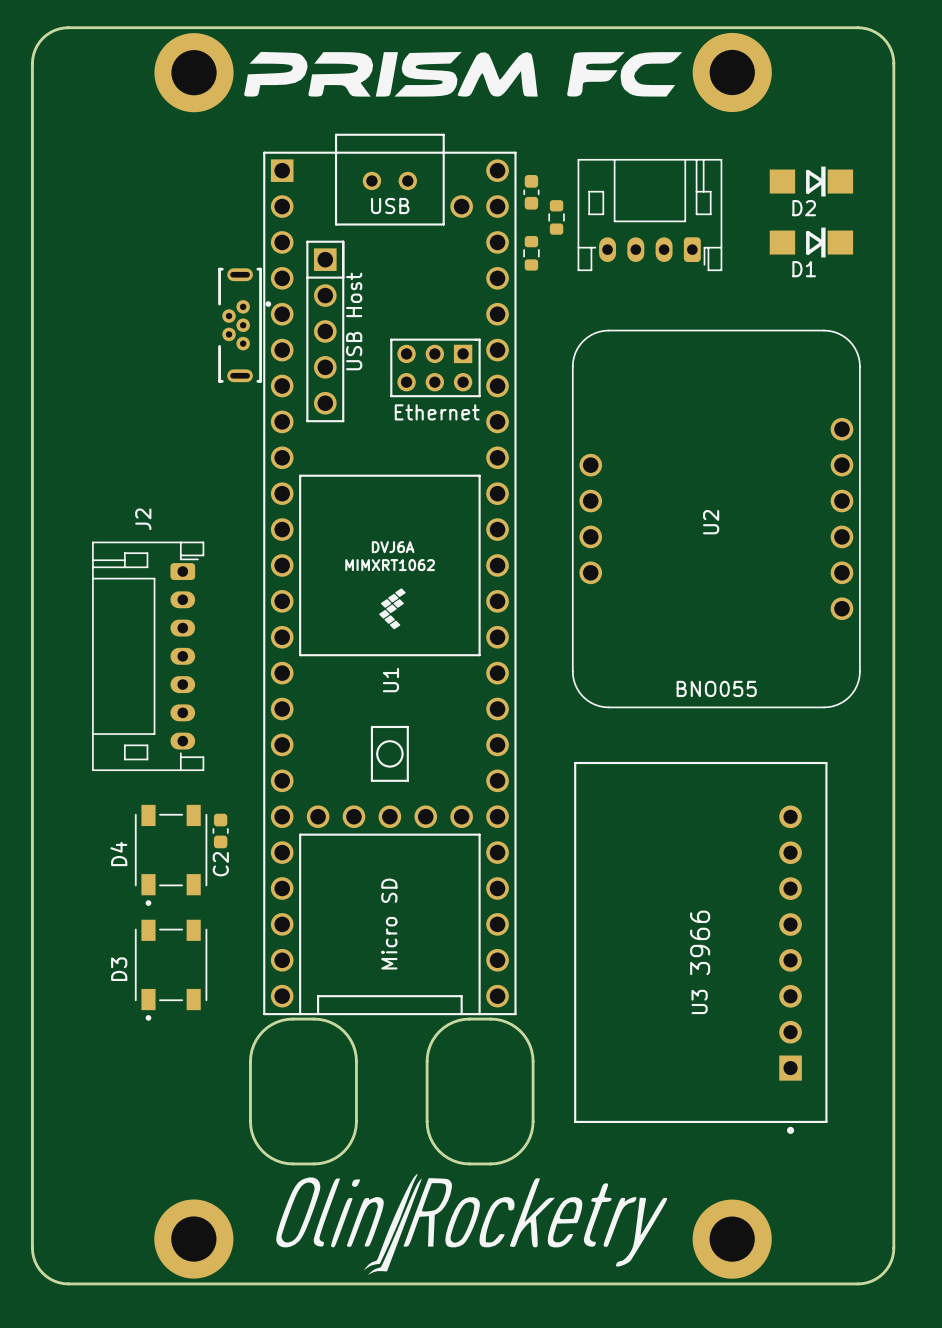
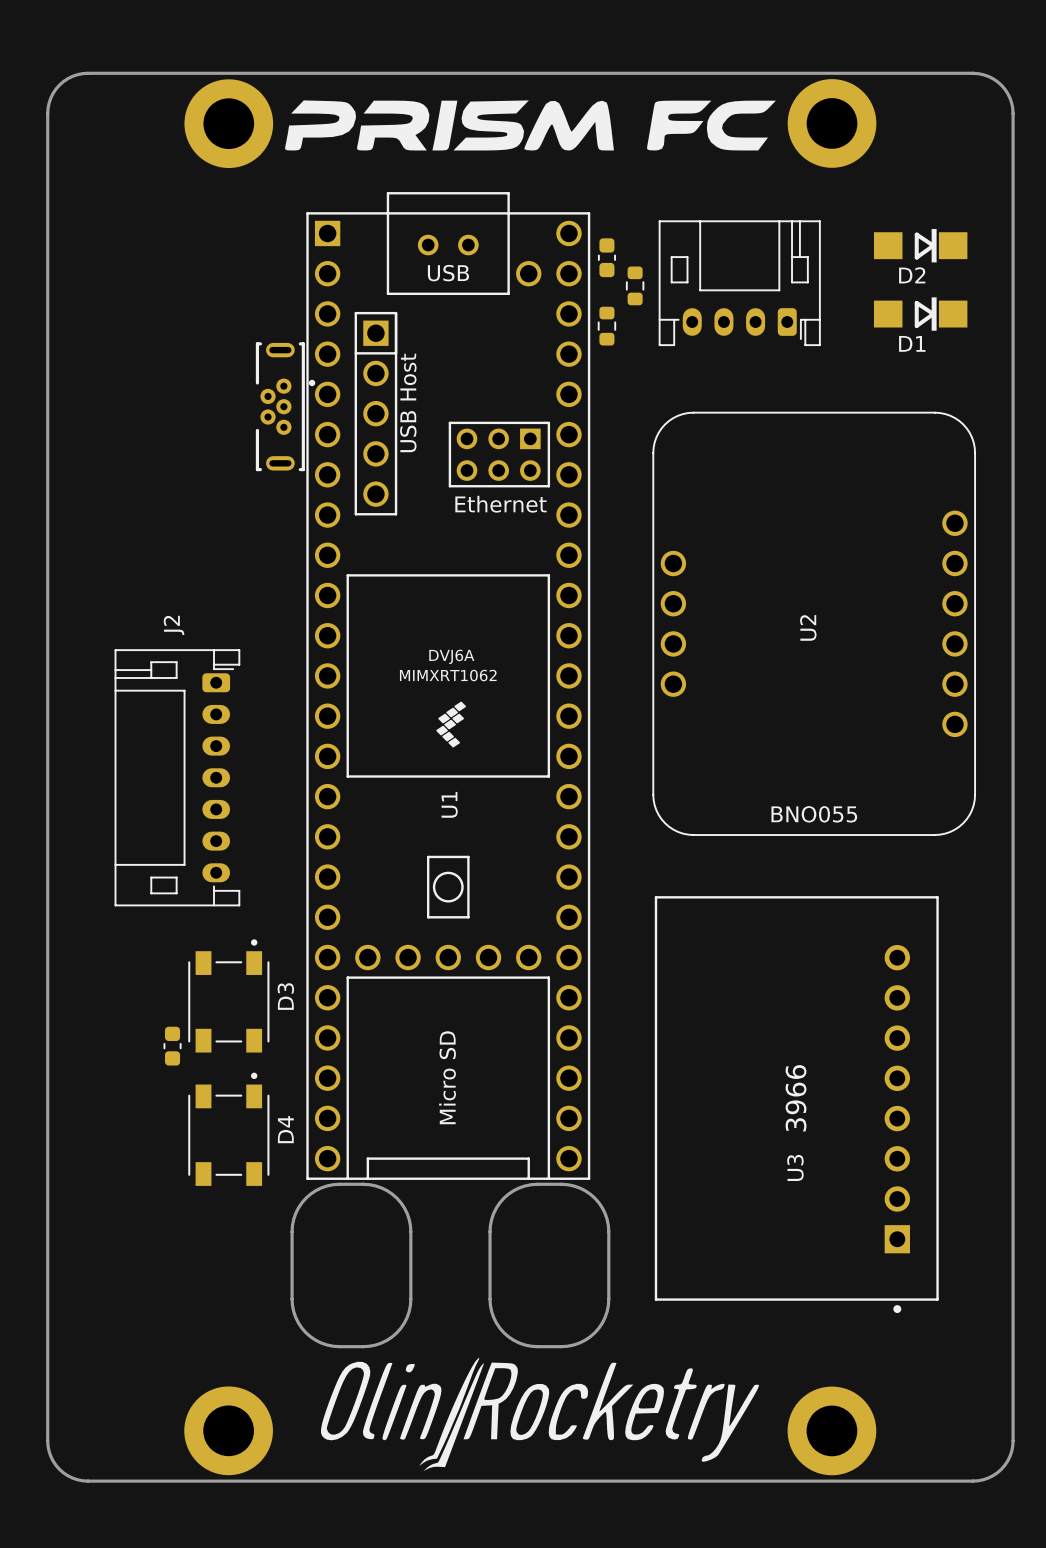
C2: (220, 830) -> none
D4 rotation: 0° (171, 855) -> 180° (228, 1129)
D4 position: (171, 855) -> (228, 1129)
part: none -> (172, 1046)
D3 rotation: 0° (171, 970) -> 180° (228, 995)
D3 position: (171, 970) -> (228, 995)

